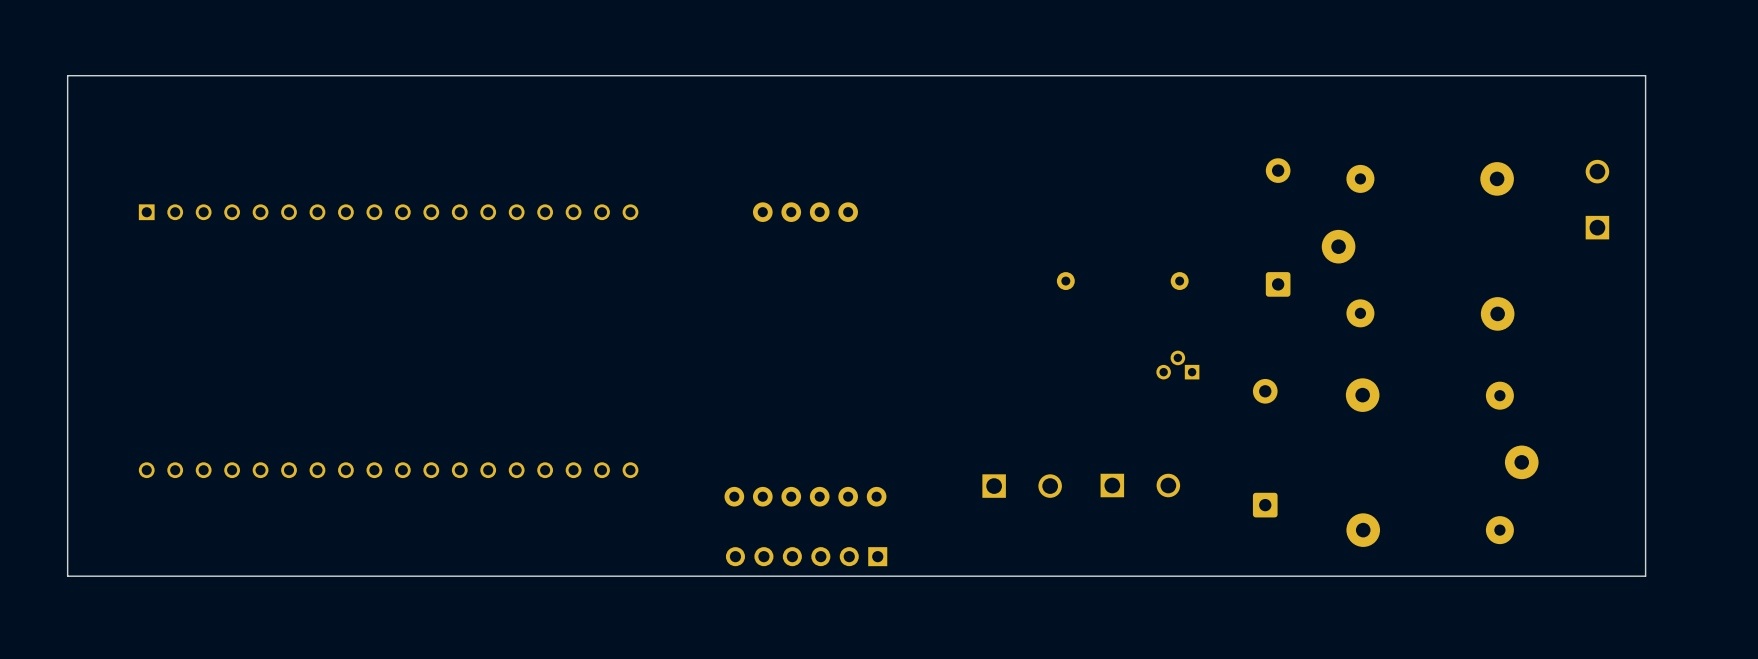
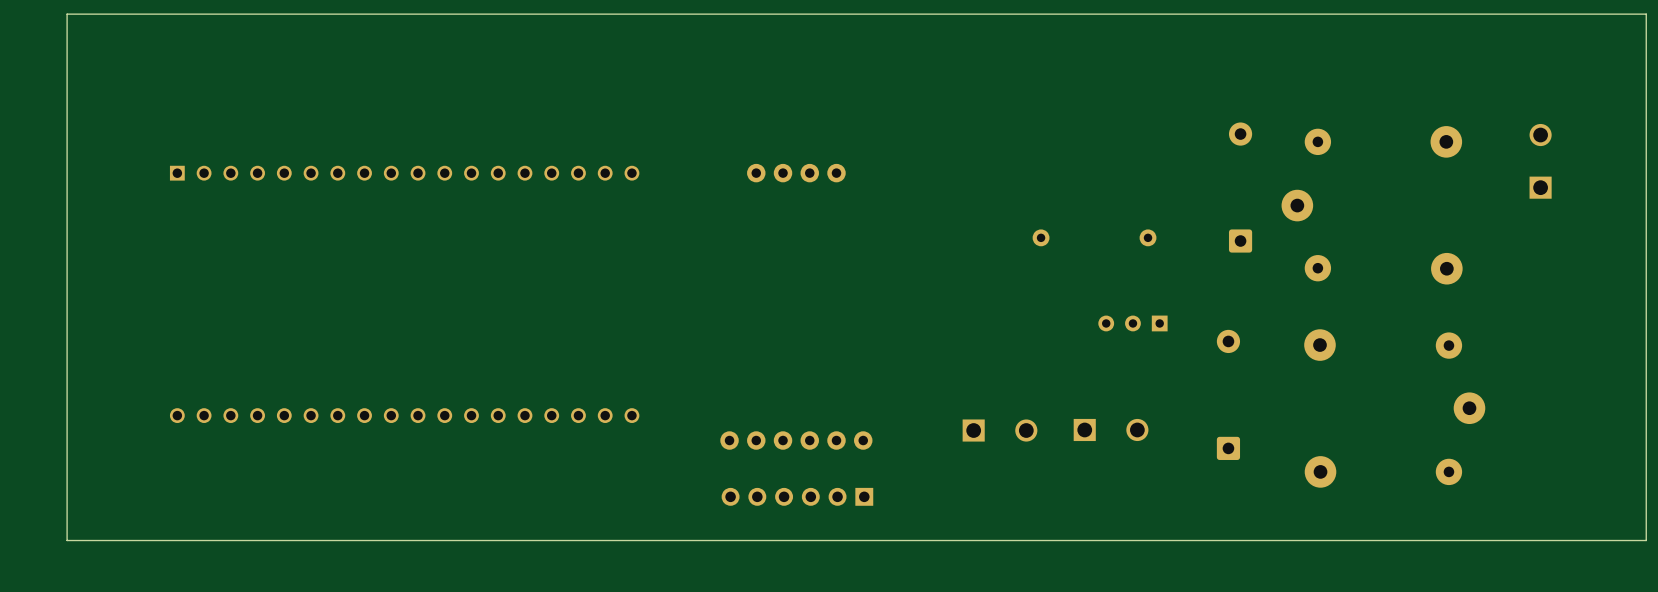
board edge: (1645, 75) (67, 75) (67, 576) (1645, 576) (1645, 75) -> (1646, 14) (1646, 540) (67, 540) (67, 14) (1646, 14)
part: (1177, 365) -> none
part: none -> (1132, 323)

